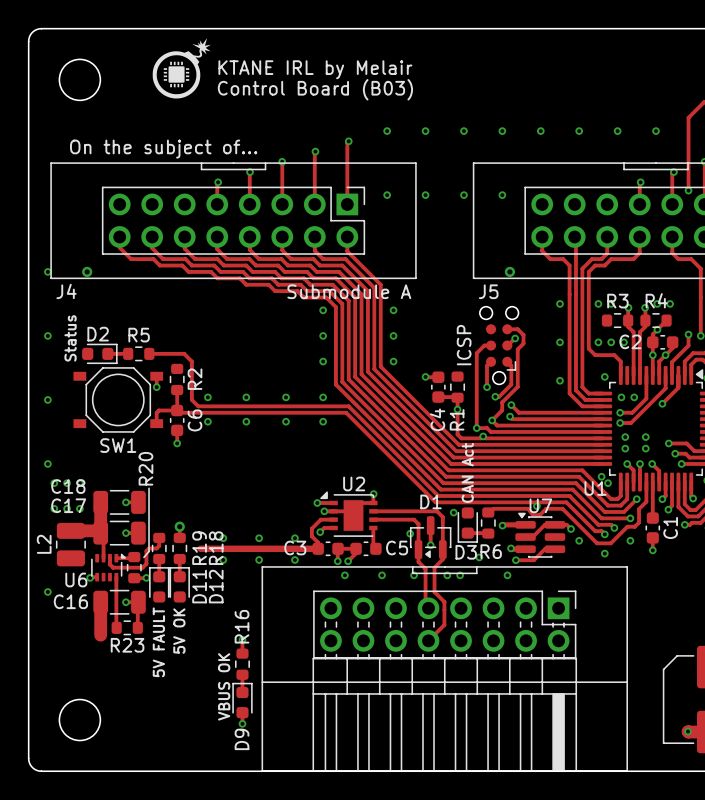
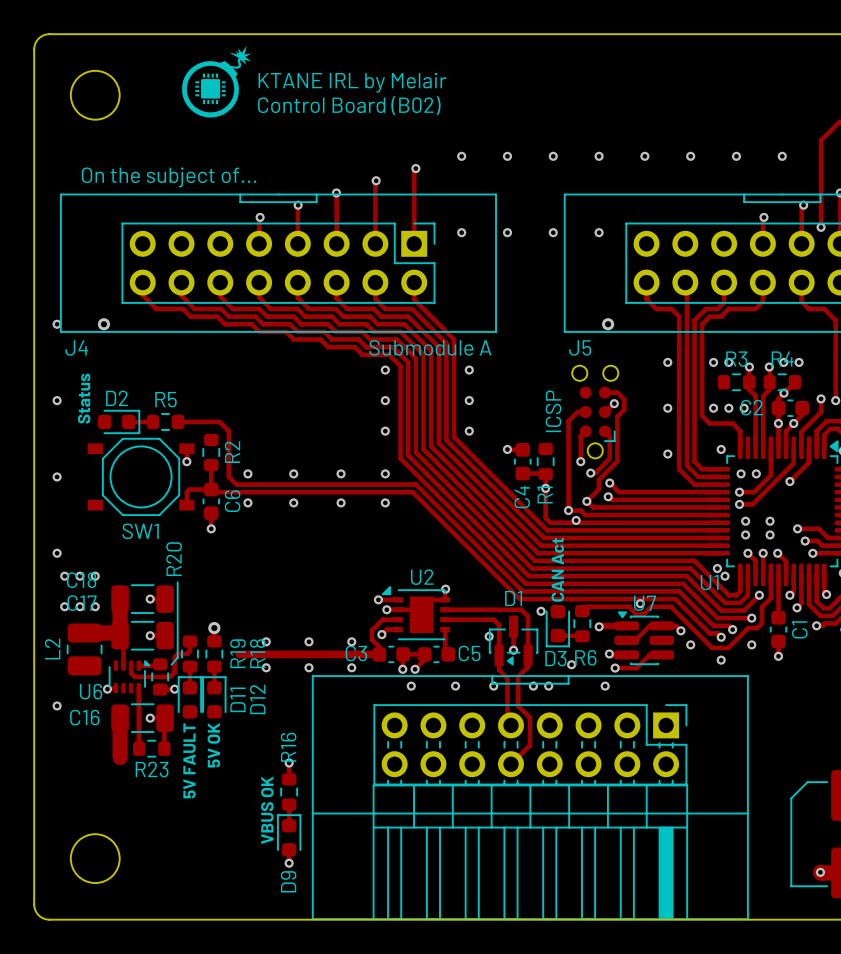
text: Control Board (B03) (315, 89) -> Control Board (B02) (349, 105)

